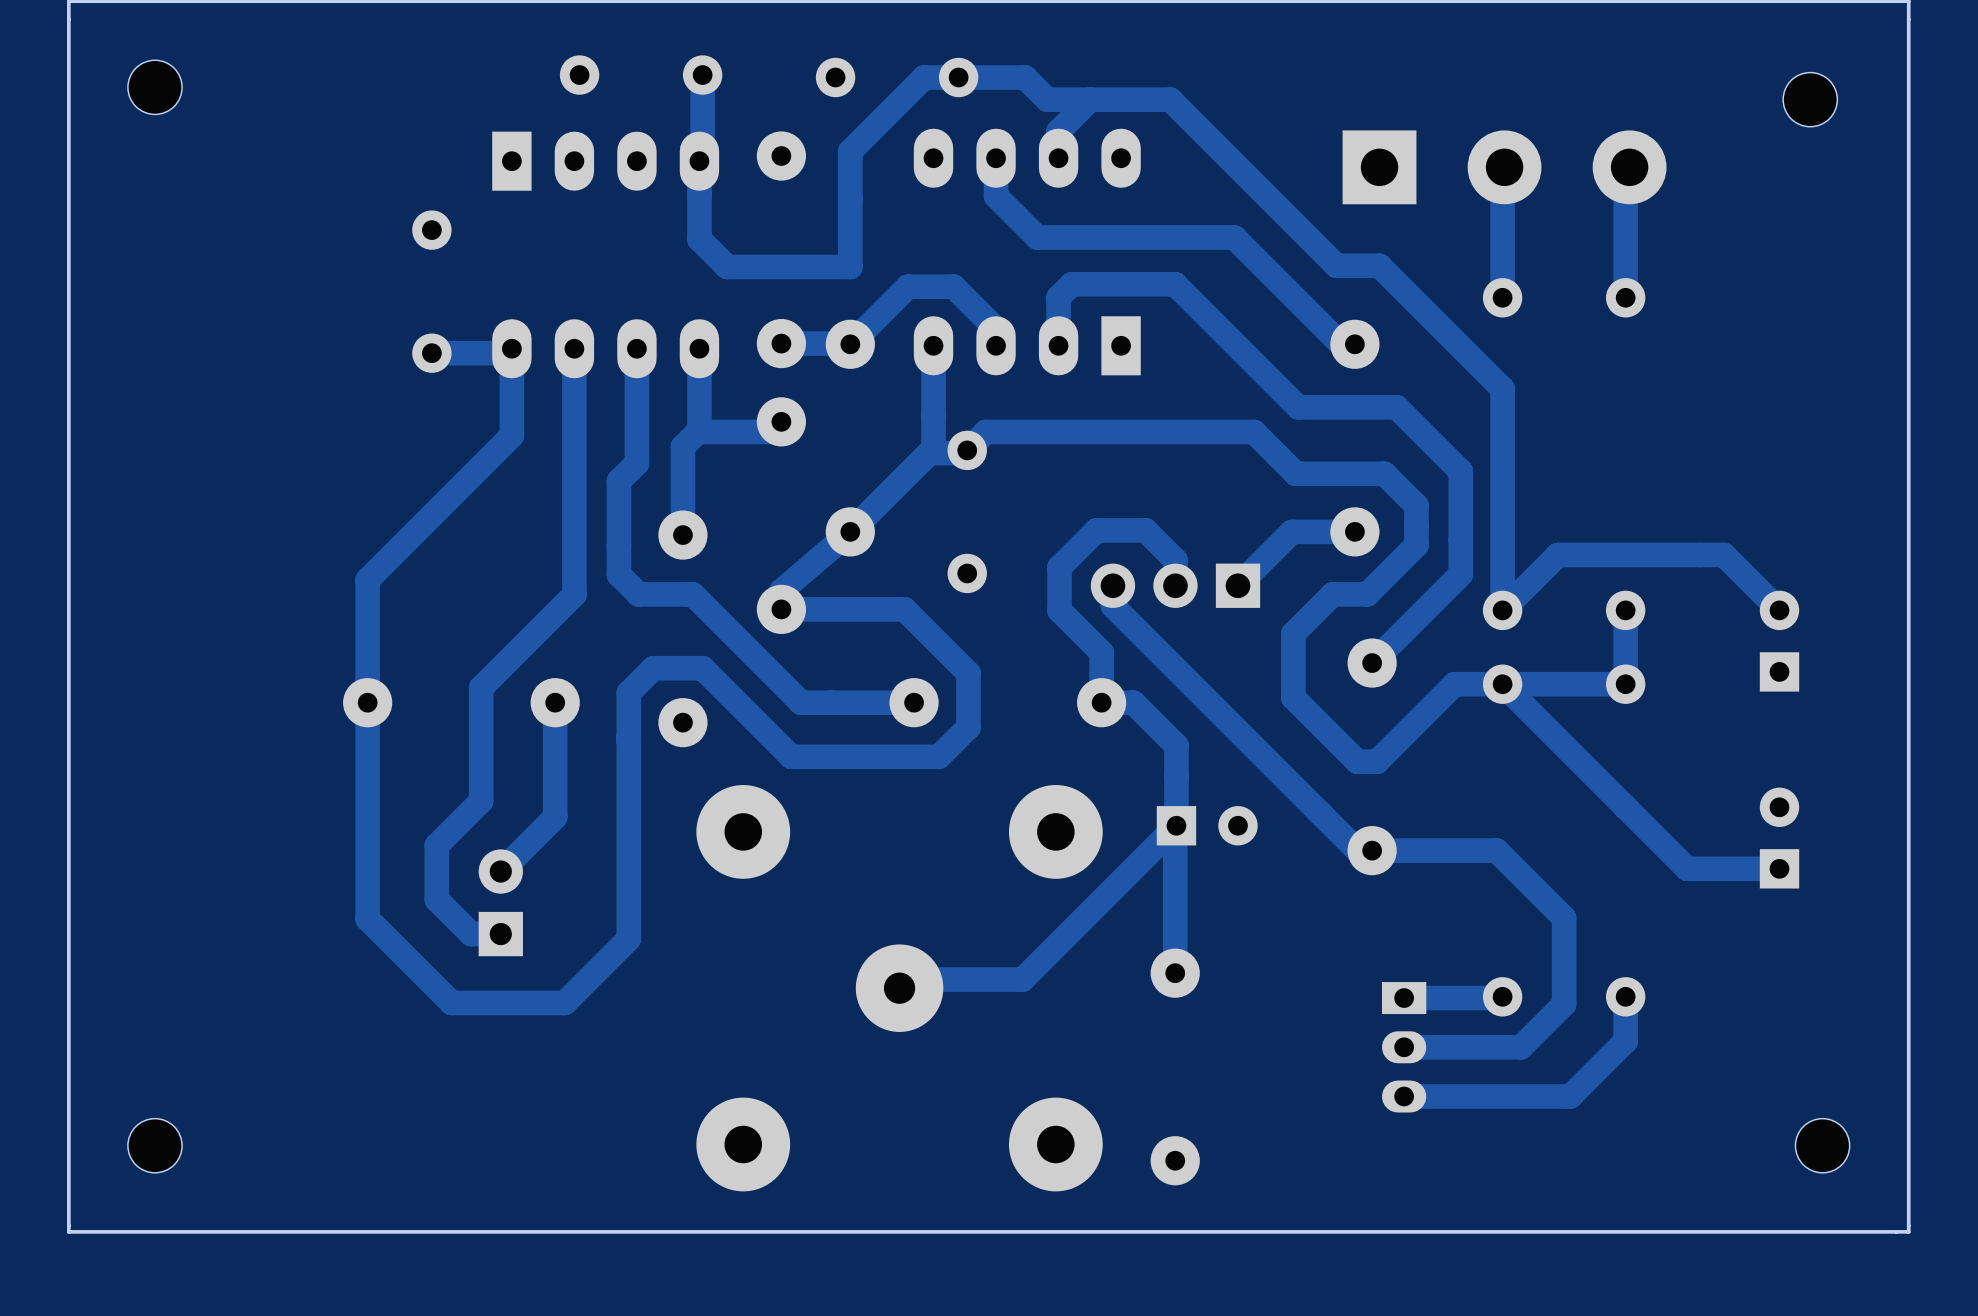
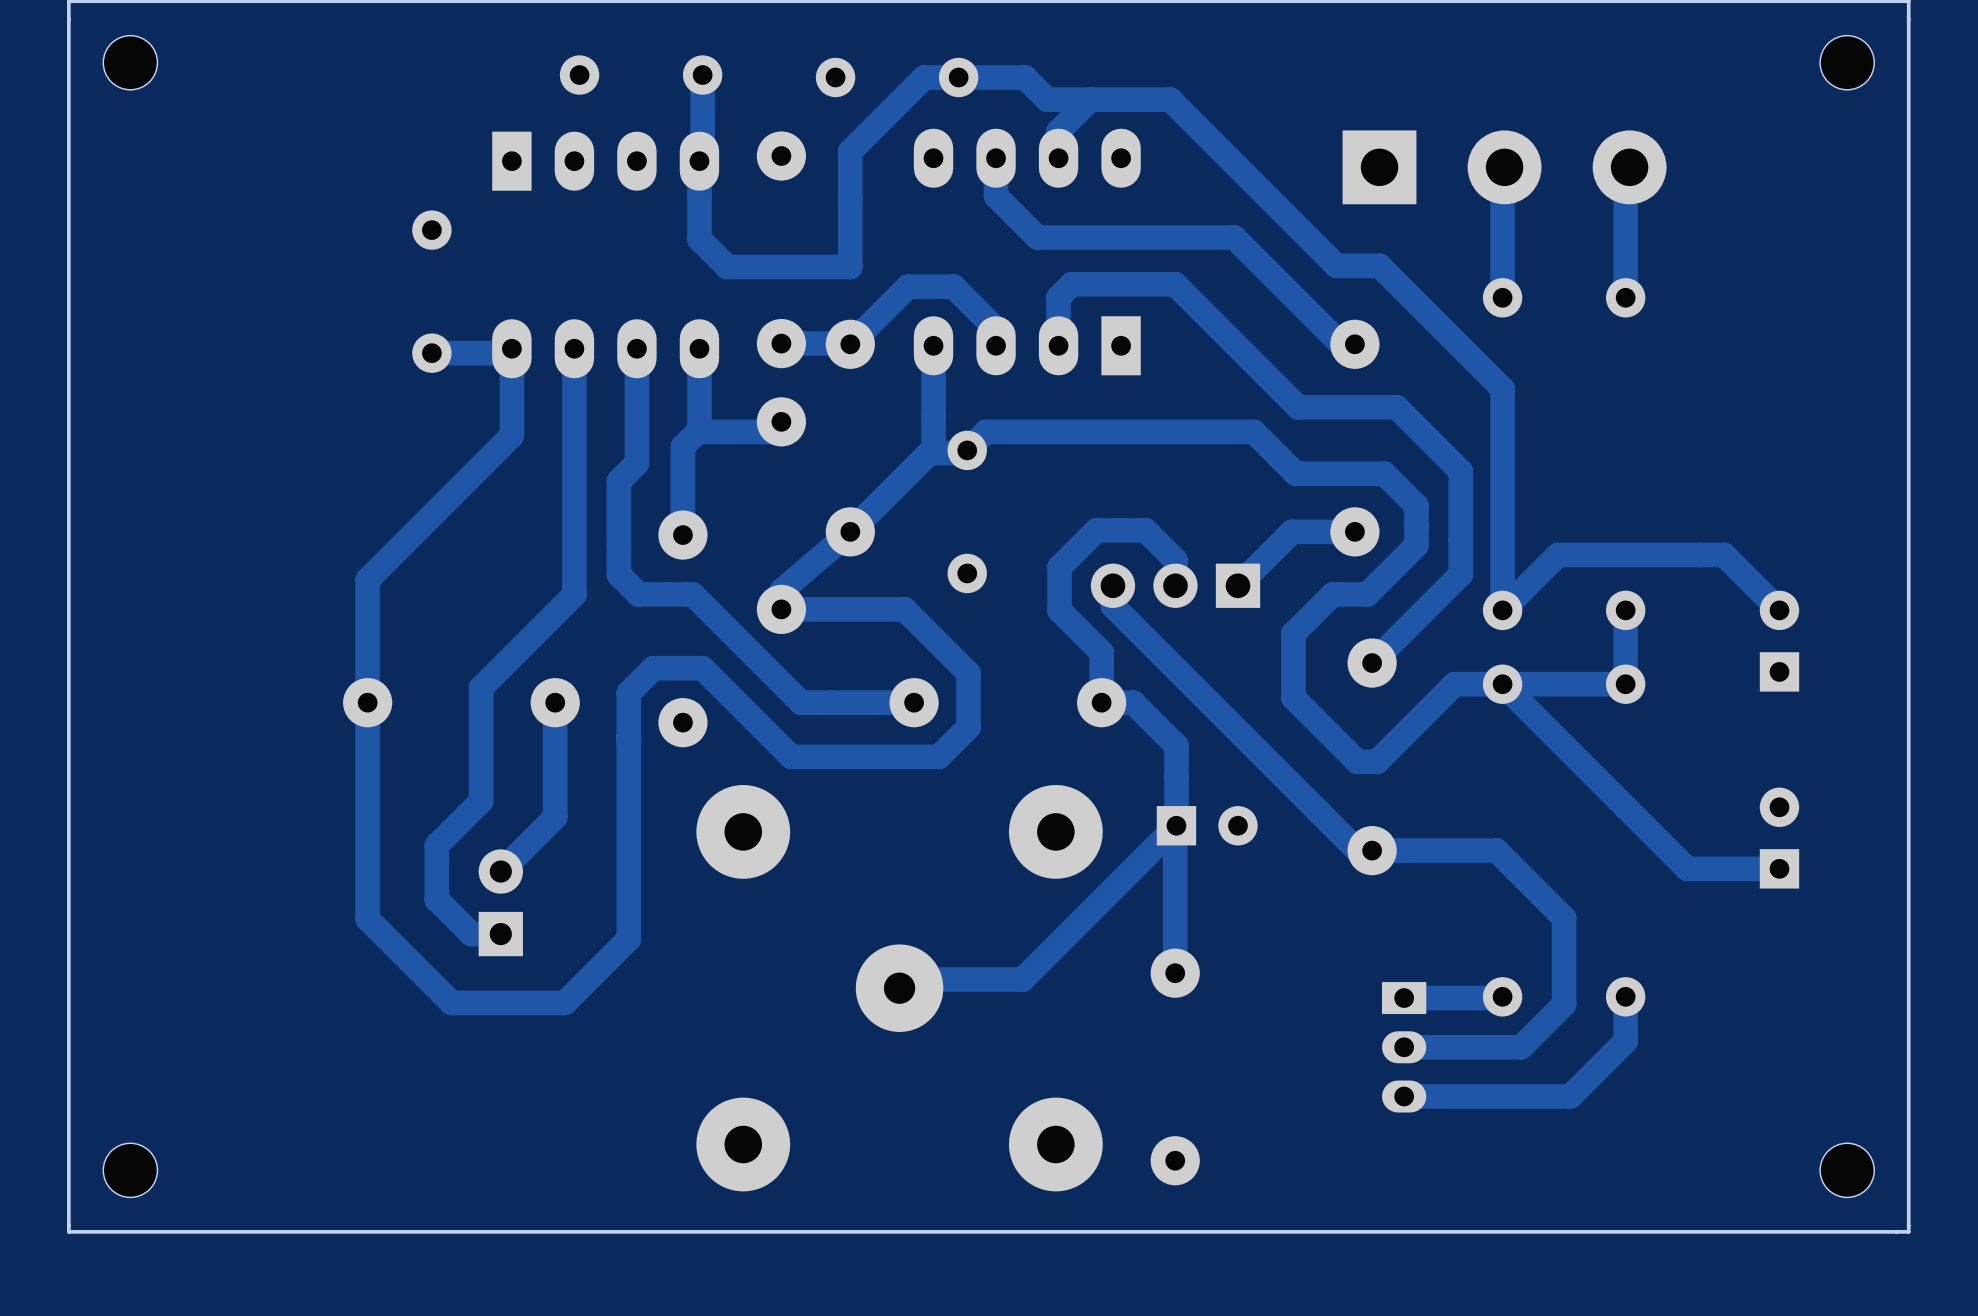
part position: (154, 87) -> (130, 62)
part position: (1810, 99) -> (1847, 62)
part position: (154, 1145) -> (130, 1170)
part position: (1822, 1145) -> (1847, 1170)

